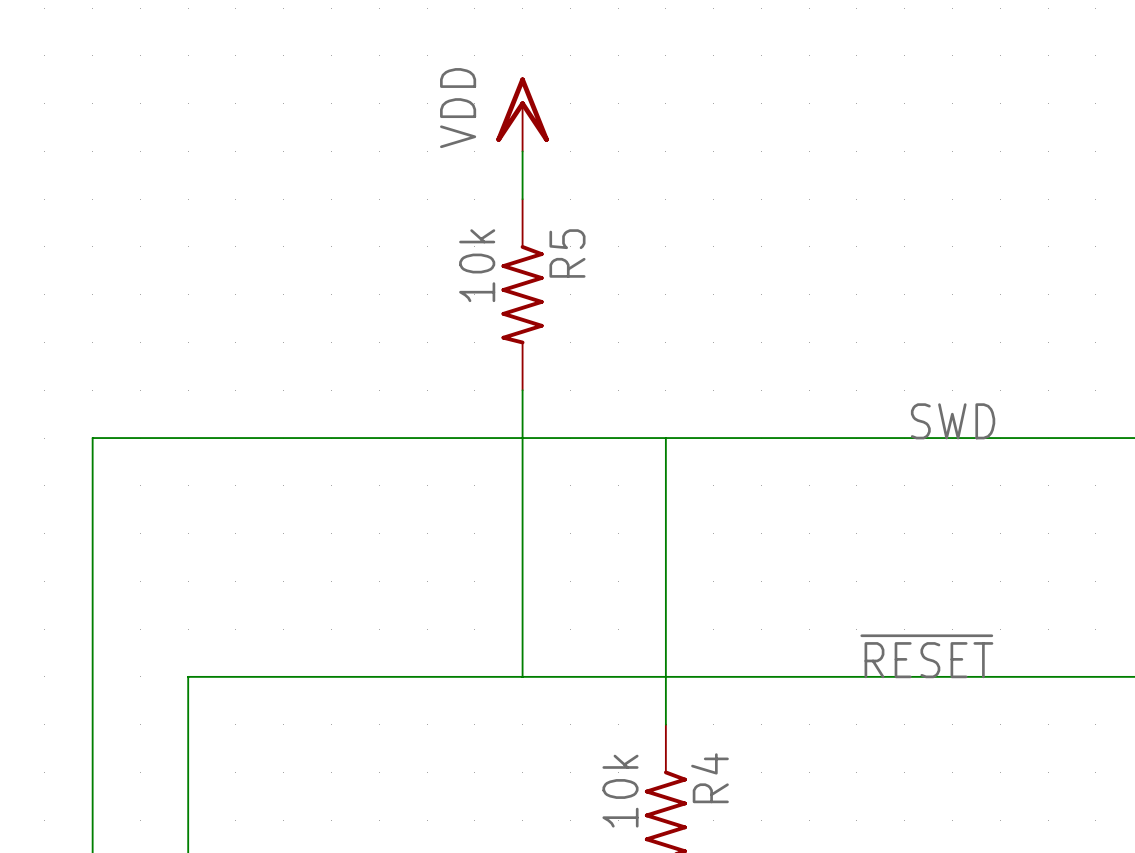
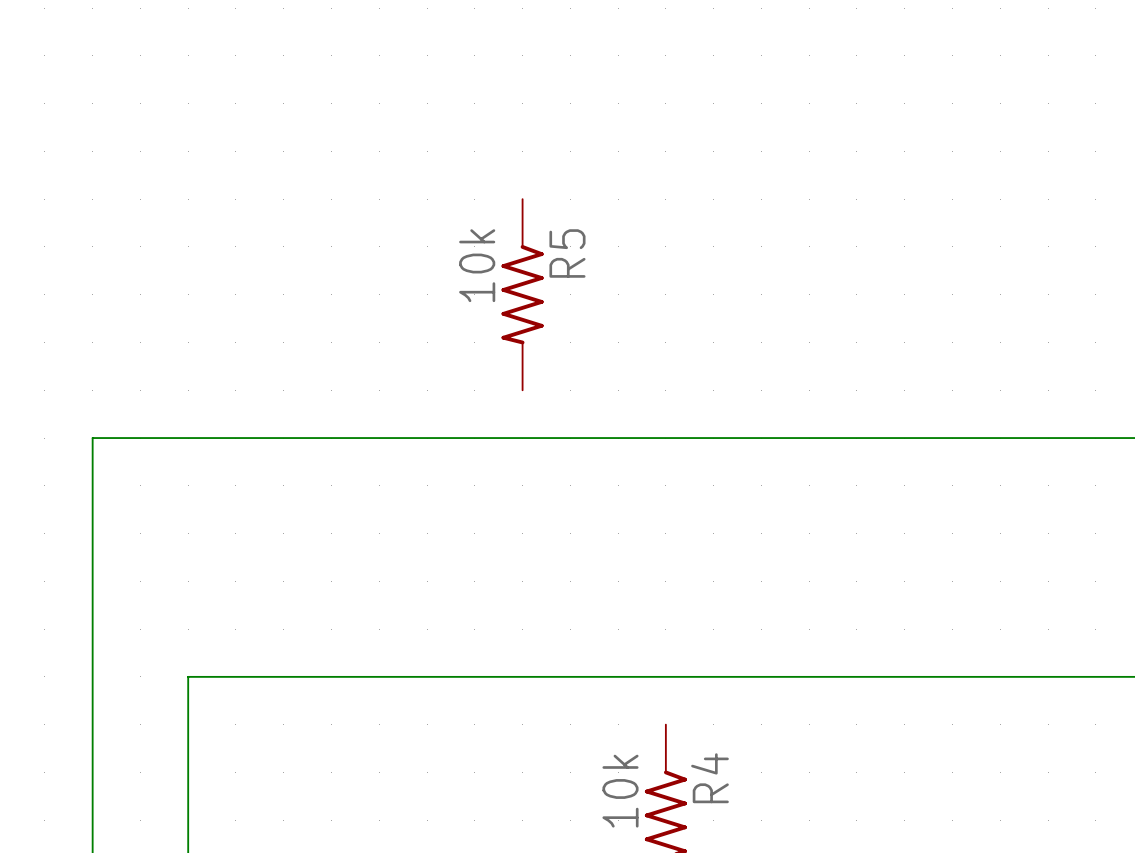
power symbol: VDD (522, 114) -> none
wire: (522, 151) (522, 199) -> none
wire: (522, 390) (522, 676) -> none
label: SWD (953, 421) -> none
wire: (665, 438) (665, 724) -> none
label: ~{RESET} (926, 656) -> none

